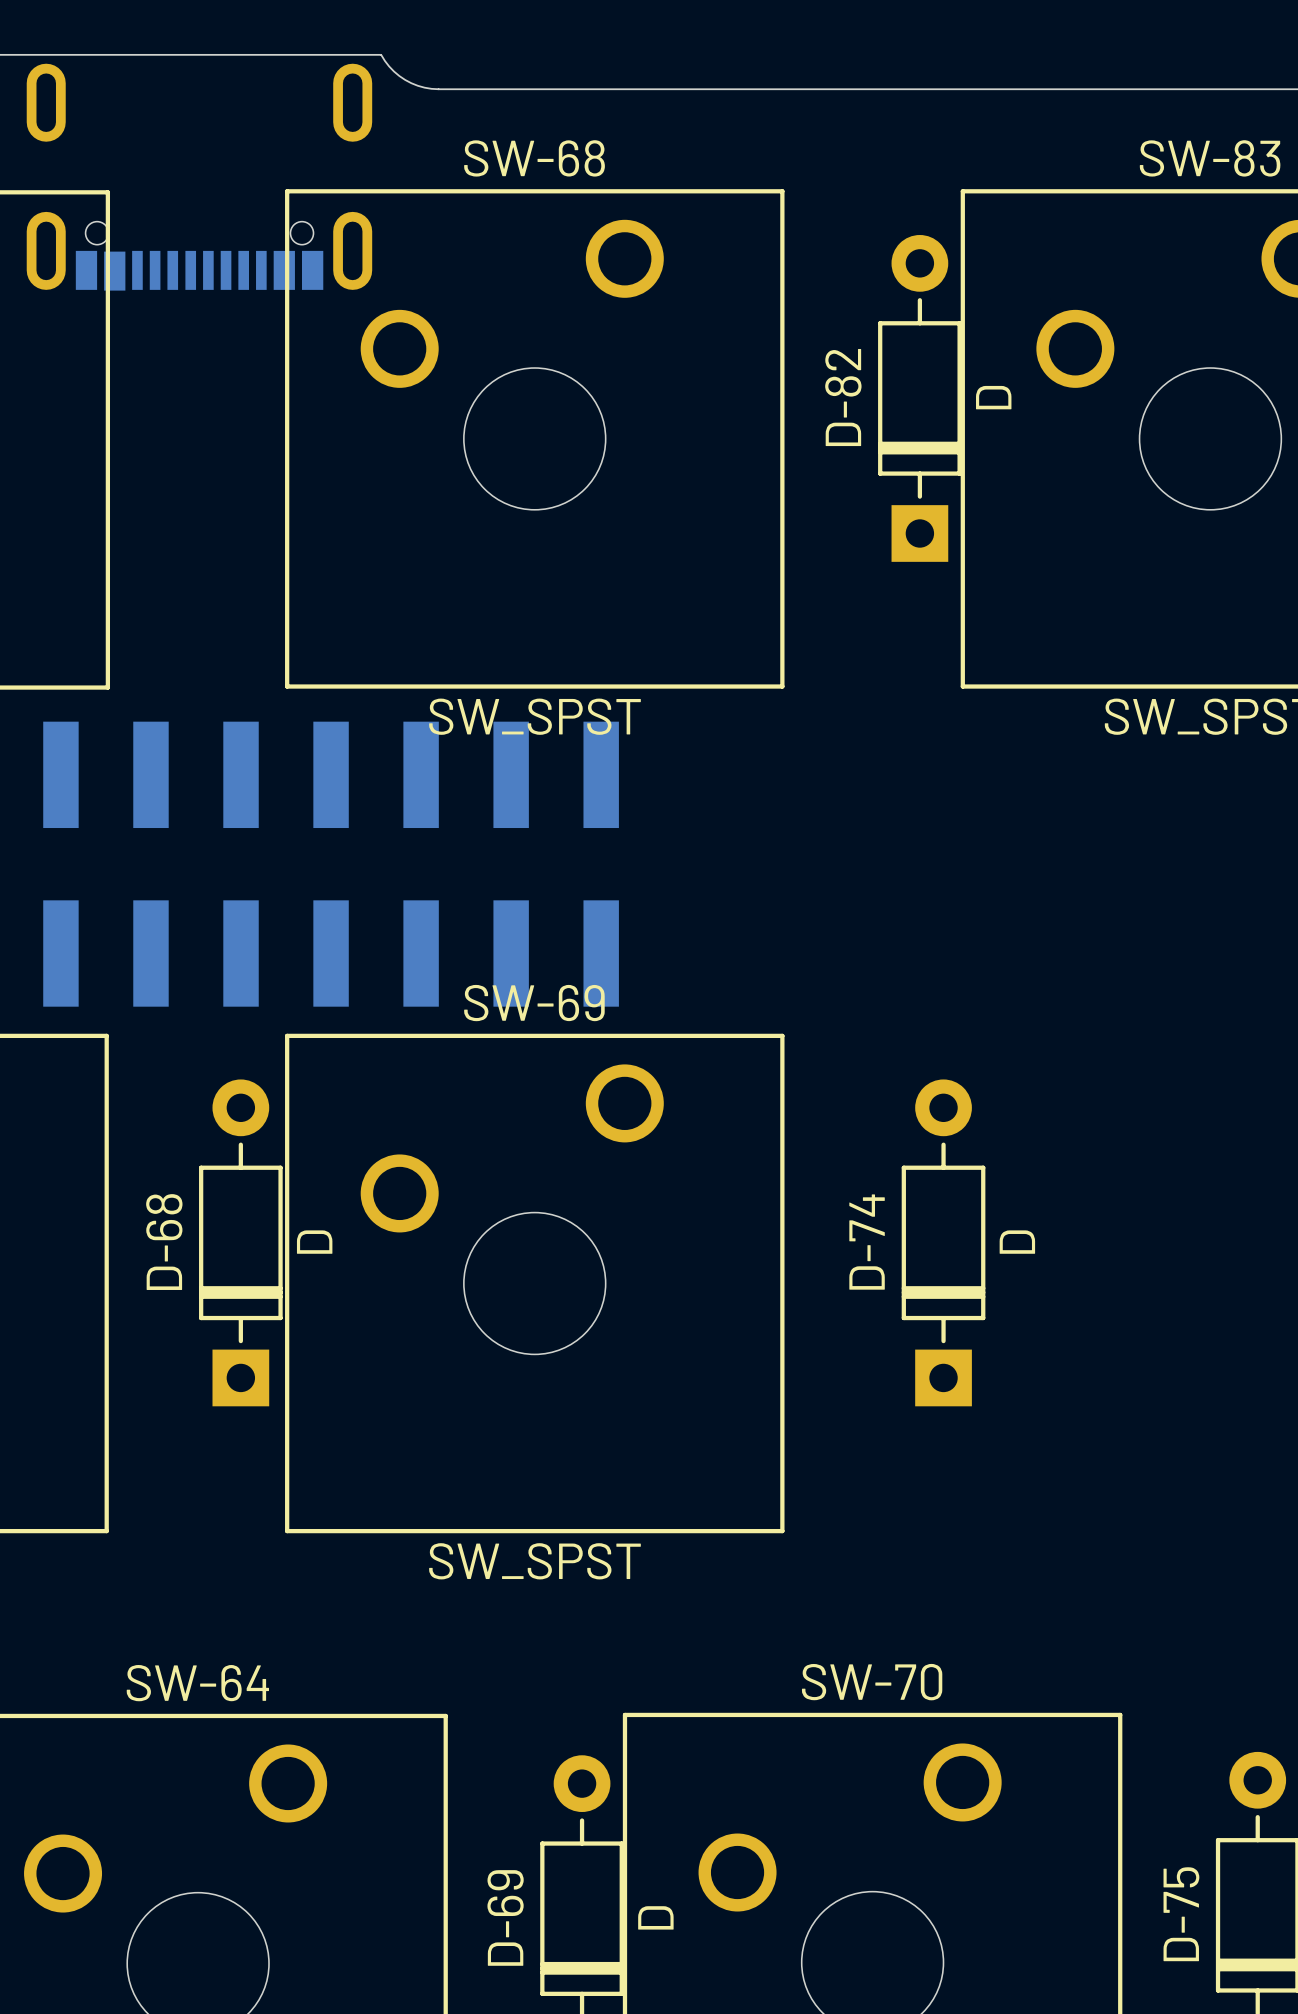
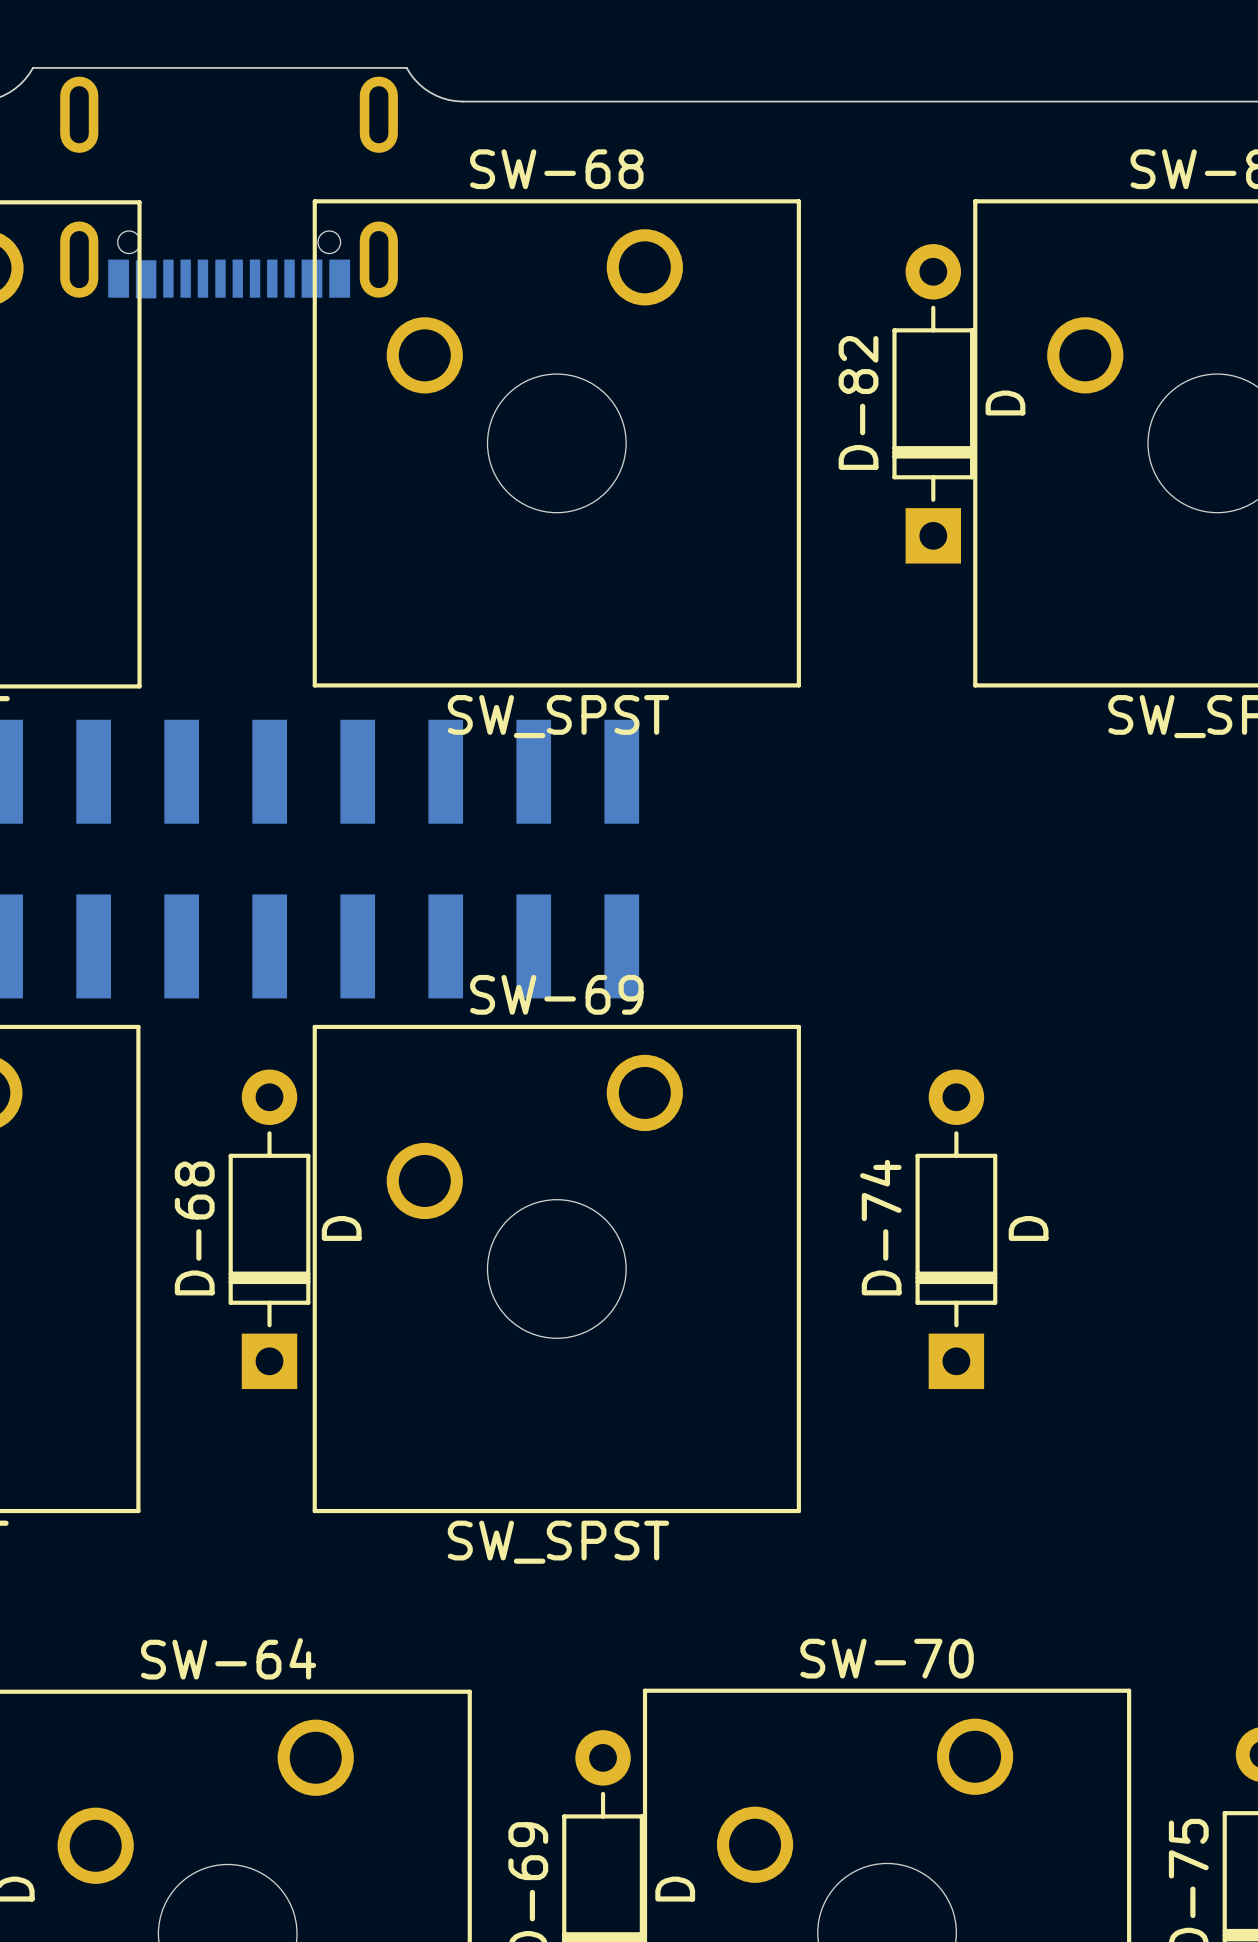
part footprint: [26, 63, 373, 291] -> [60, 76, 398, 299]

